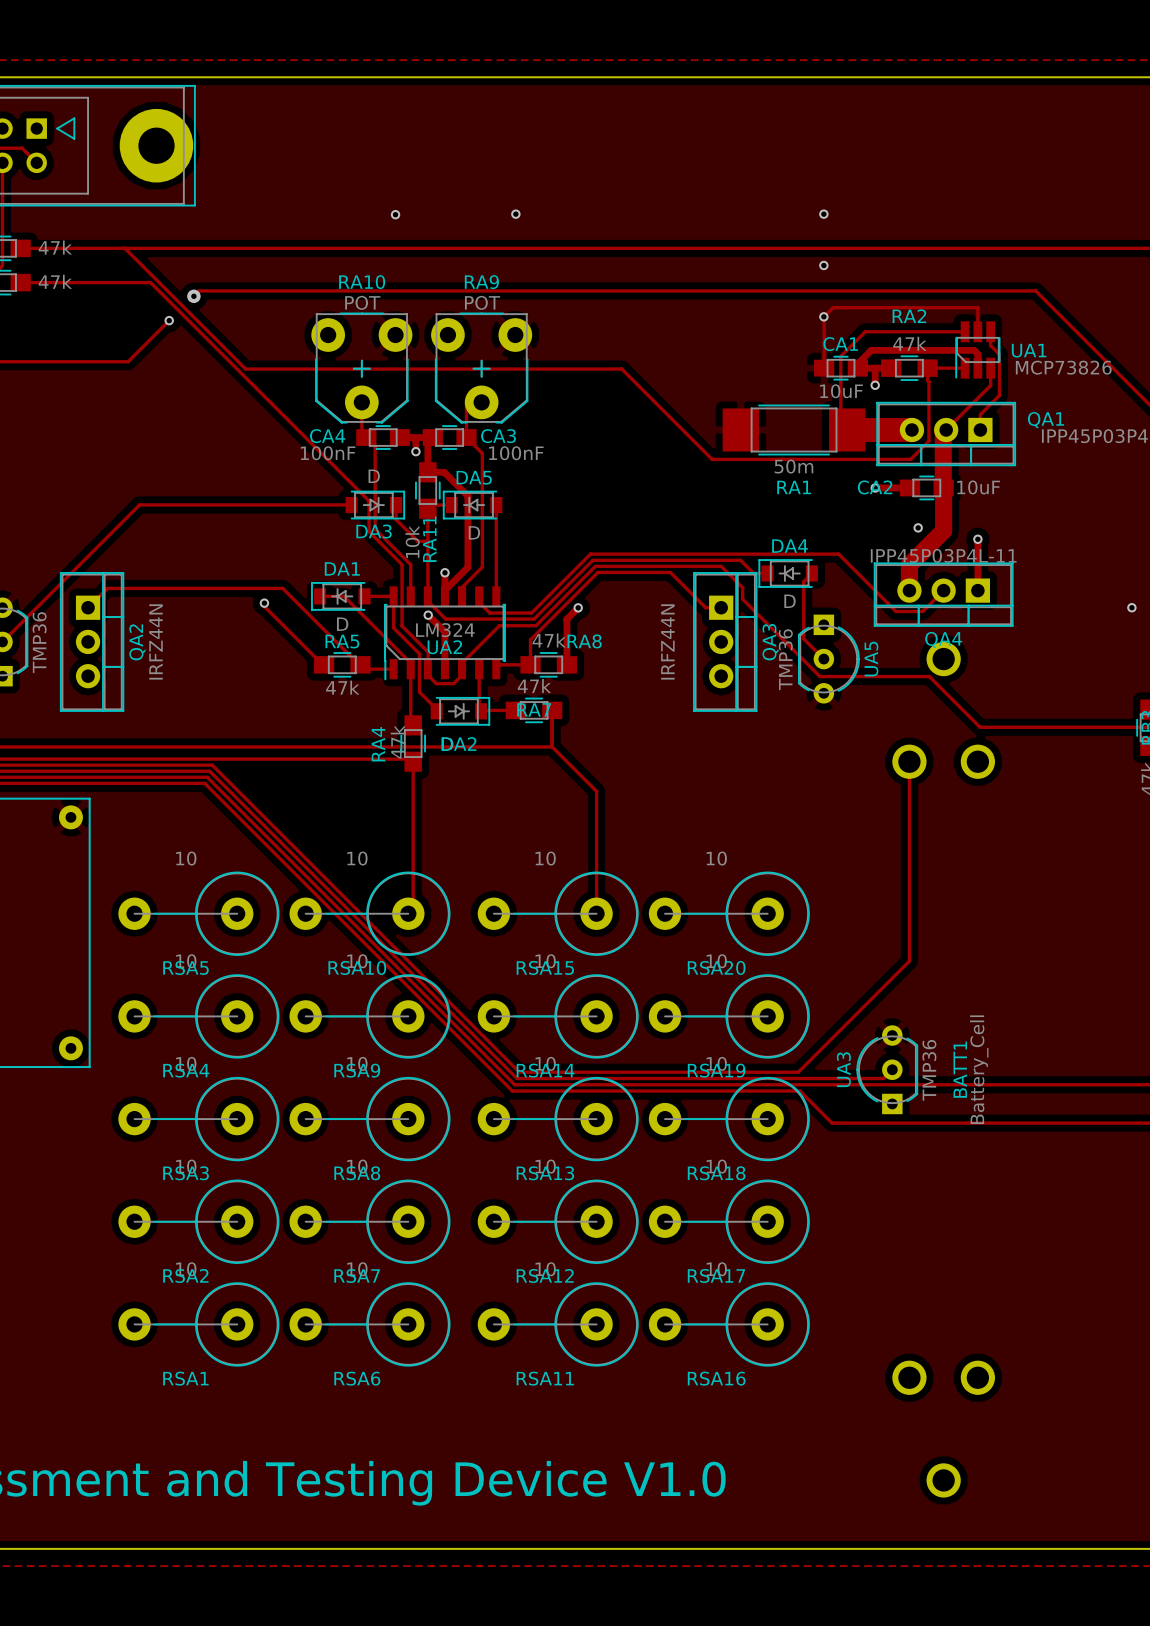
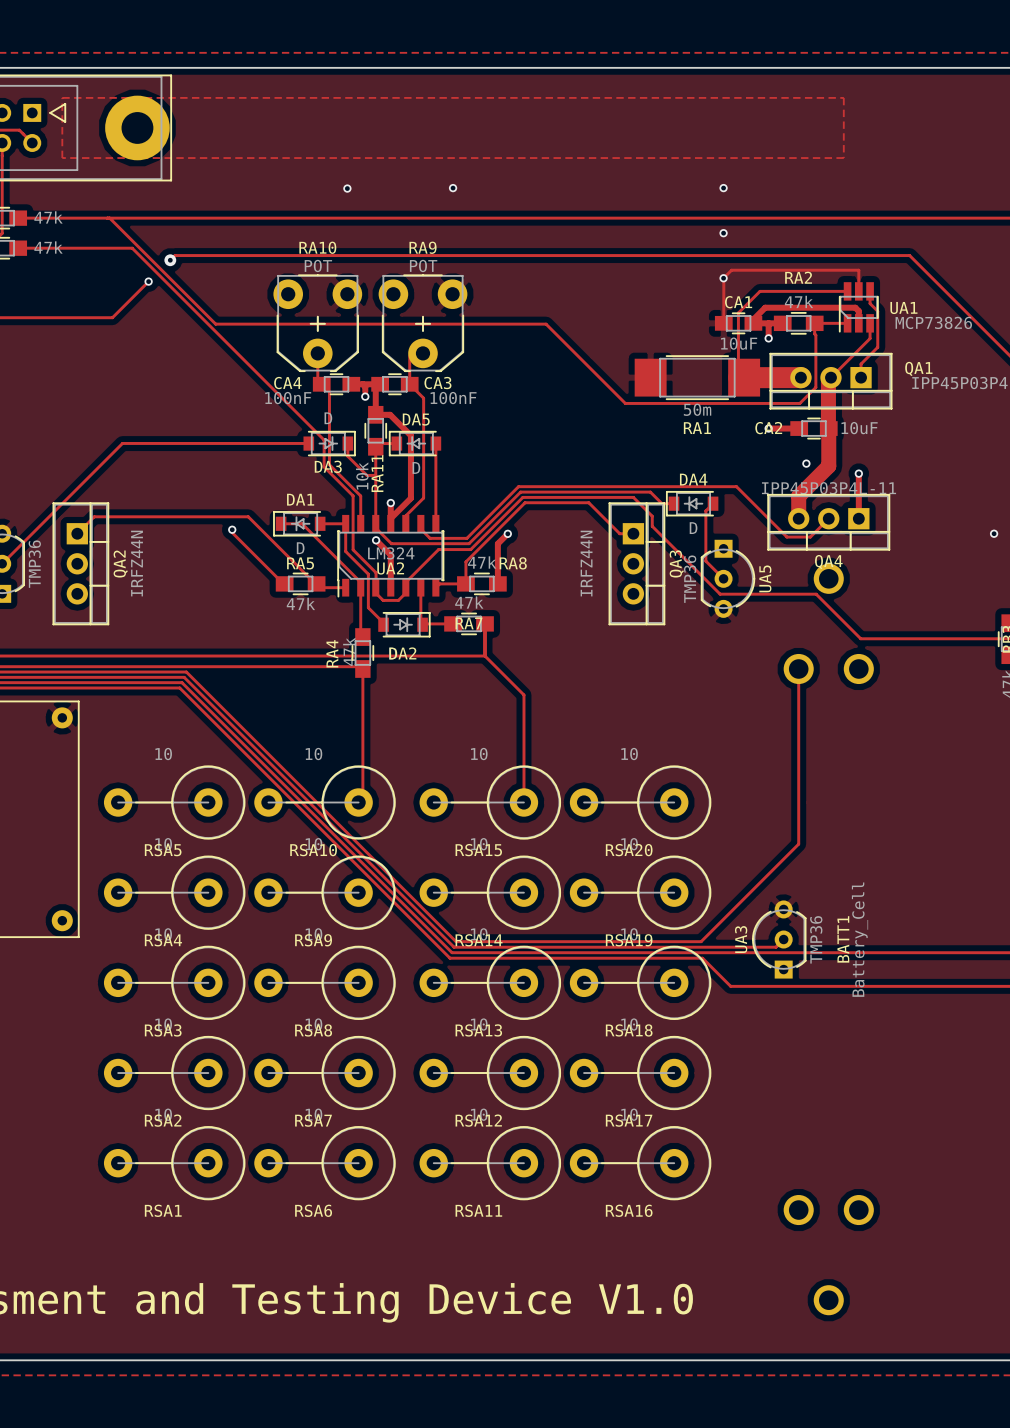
zone outline: none -> (62, 97) (62, 158) (843, 158) (843, 97) (62, 97)

